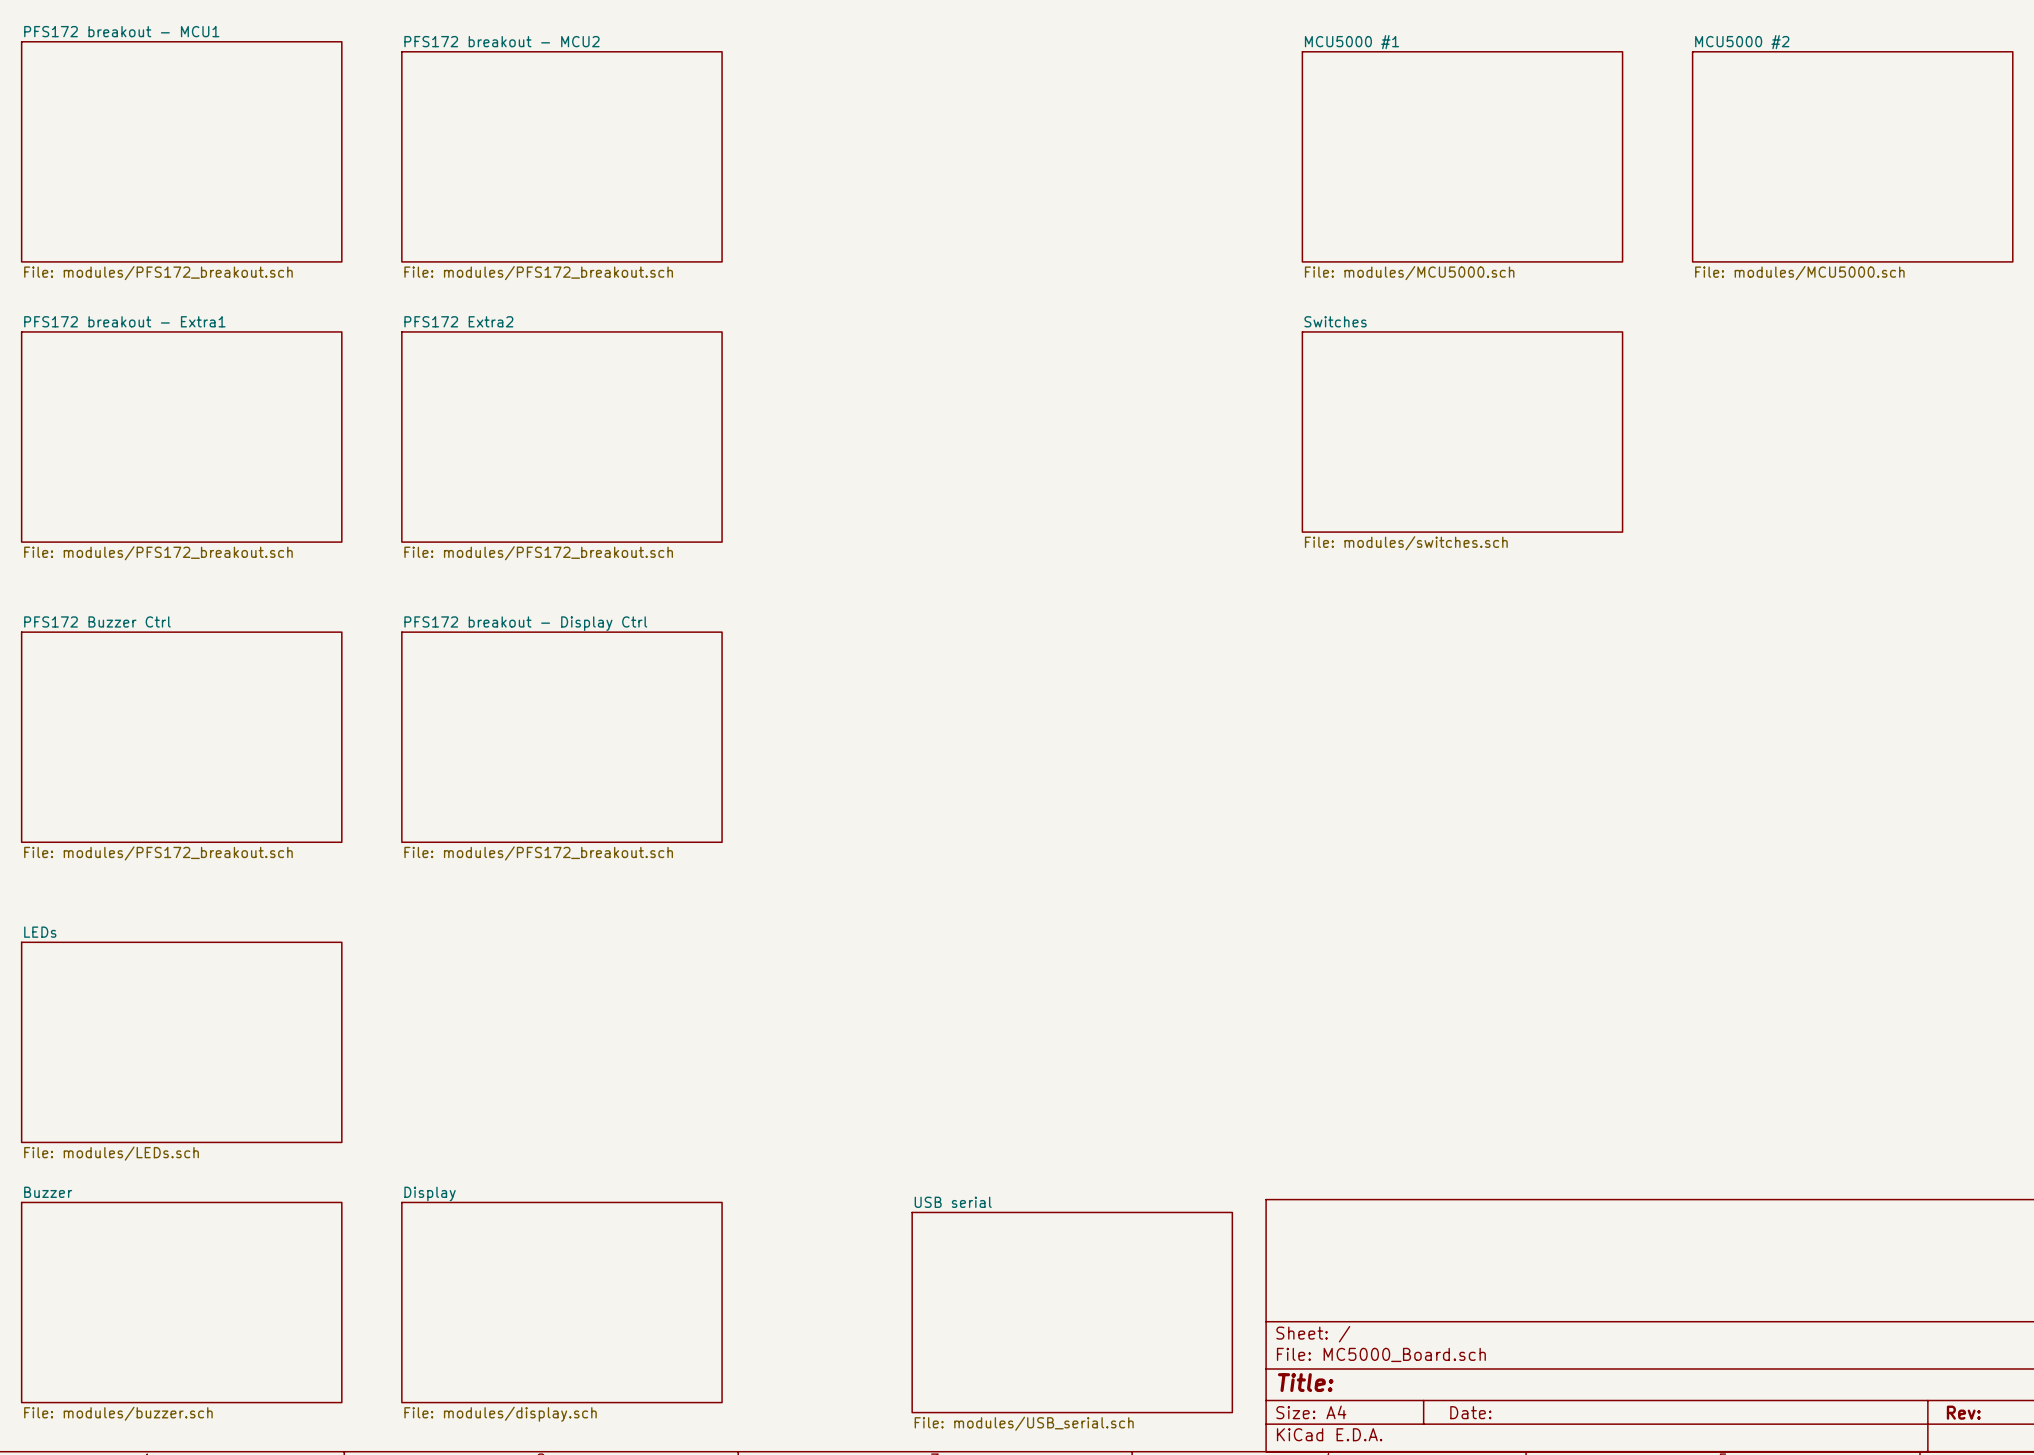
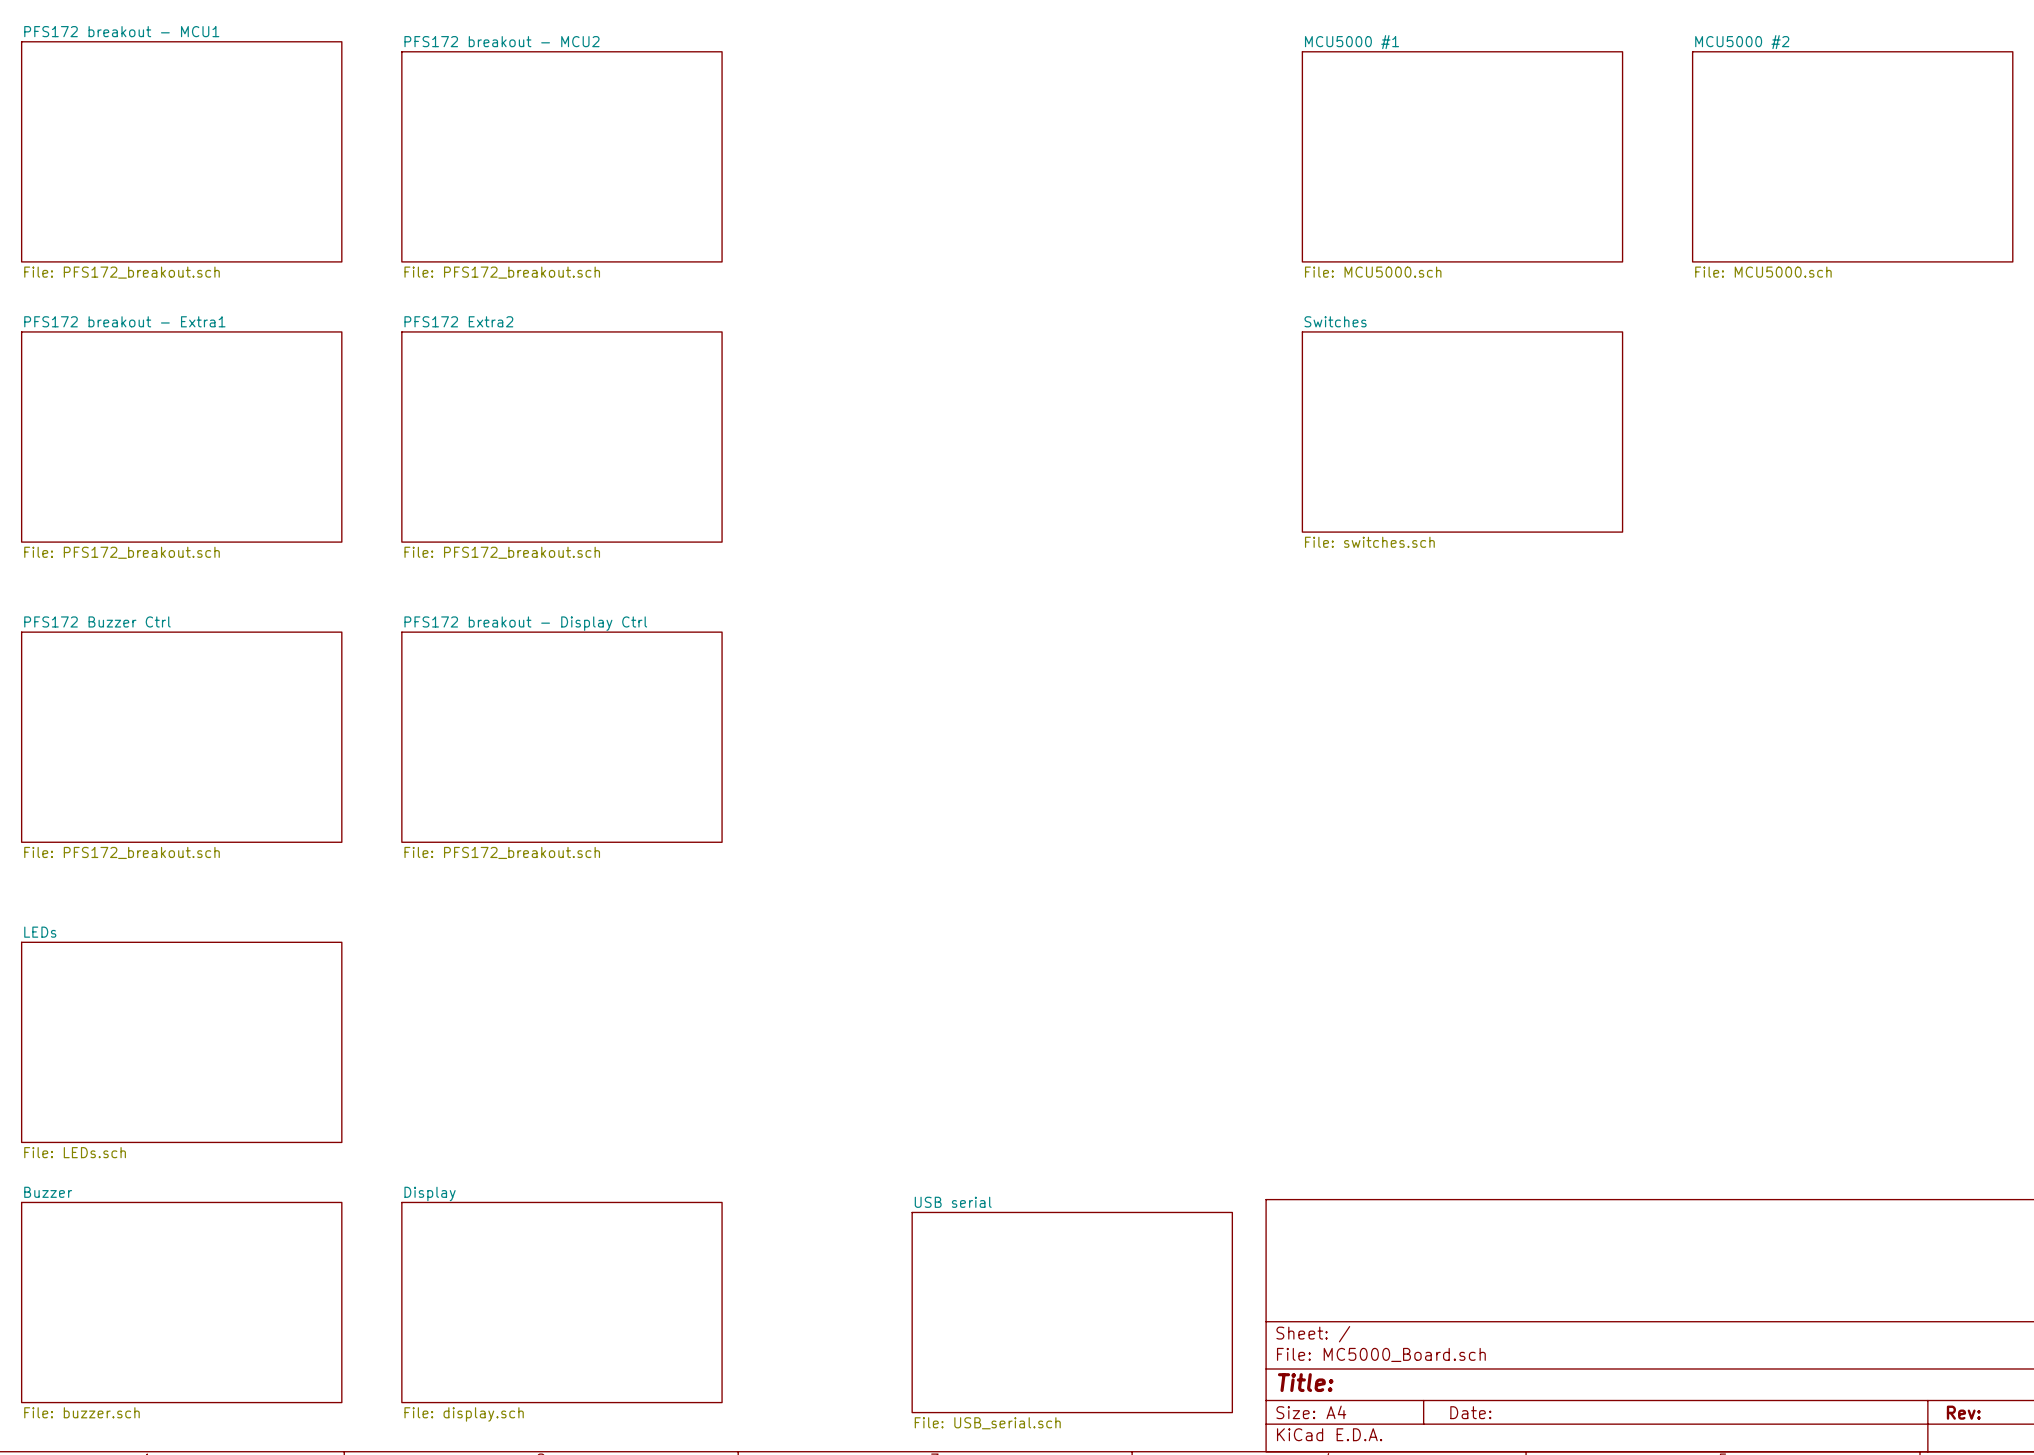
sheet PFS172 breakout - MCU1 value: File: modules/PFS172_breakout.sch (158, 273) -> File: PFS172_breakout.sch (122, 272)
sheet PFS172 breakout - MCU2 value: File: modules/PFS172_breakout.sch (538, 273) -> File: PFS172_breakout.sch (502, 272)
sheet MCU5000 #1 value: File: modules/MCU5000.sch (1409, 273) -> File: MCU5000.sch (1373, 272)
sheet MCU5000 #2 value: File: modules/MCU5000.sch (1799, 273) -> File: MCU5000.sch (1763, 272)
sheet Switches value: File: modules/switches.sch (1406, 543) -> File: switches.sch (1369, 542)
sheet PFS172 breakout - Extra1 value: File: modules/PFS172_breakout.sch (158, 553) -> File: PFS172_breakout.sch (122, 552)
sheet PFS172 Extra2 value: File: modules/PFS172_breakout.sch (538, 553) -> File: PFS172_breakout.sch (502, 552)
sheet PFS172 Buzzer Ctrl value: File: modules/PFS172_breakout.sch (158, 853) -> File: PFS172_breakout.sch (122, 852)
sheet PFS172 breakout - Display Ctrl value: File: modules/PFS172_breakout.sch (538, 853) -> File: PFS172_breakout.sch (502, 852)
sheet LEDs value: File: modules/LEDs.sch (111, 1153) -> File: LEDs.sch (75, 1152)
sheet Buzzer value: File: modules/buzzer.sch (118, 1413) -> File: buzzer.sch (81, 1412)
sheet Display value: File: modules/display.sch (500, 1414) -> File: display.sch (464, 1414)
sheet USB serial value: File: modules/USB_serial.sch (1024, 1423) -> File: USB_serial.sch (987, 1423)

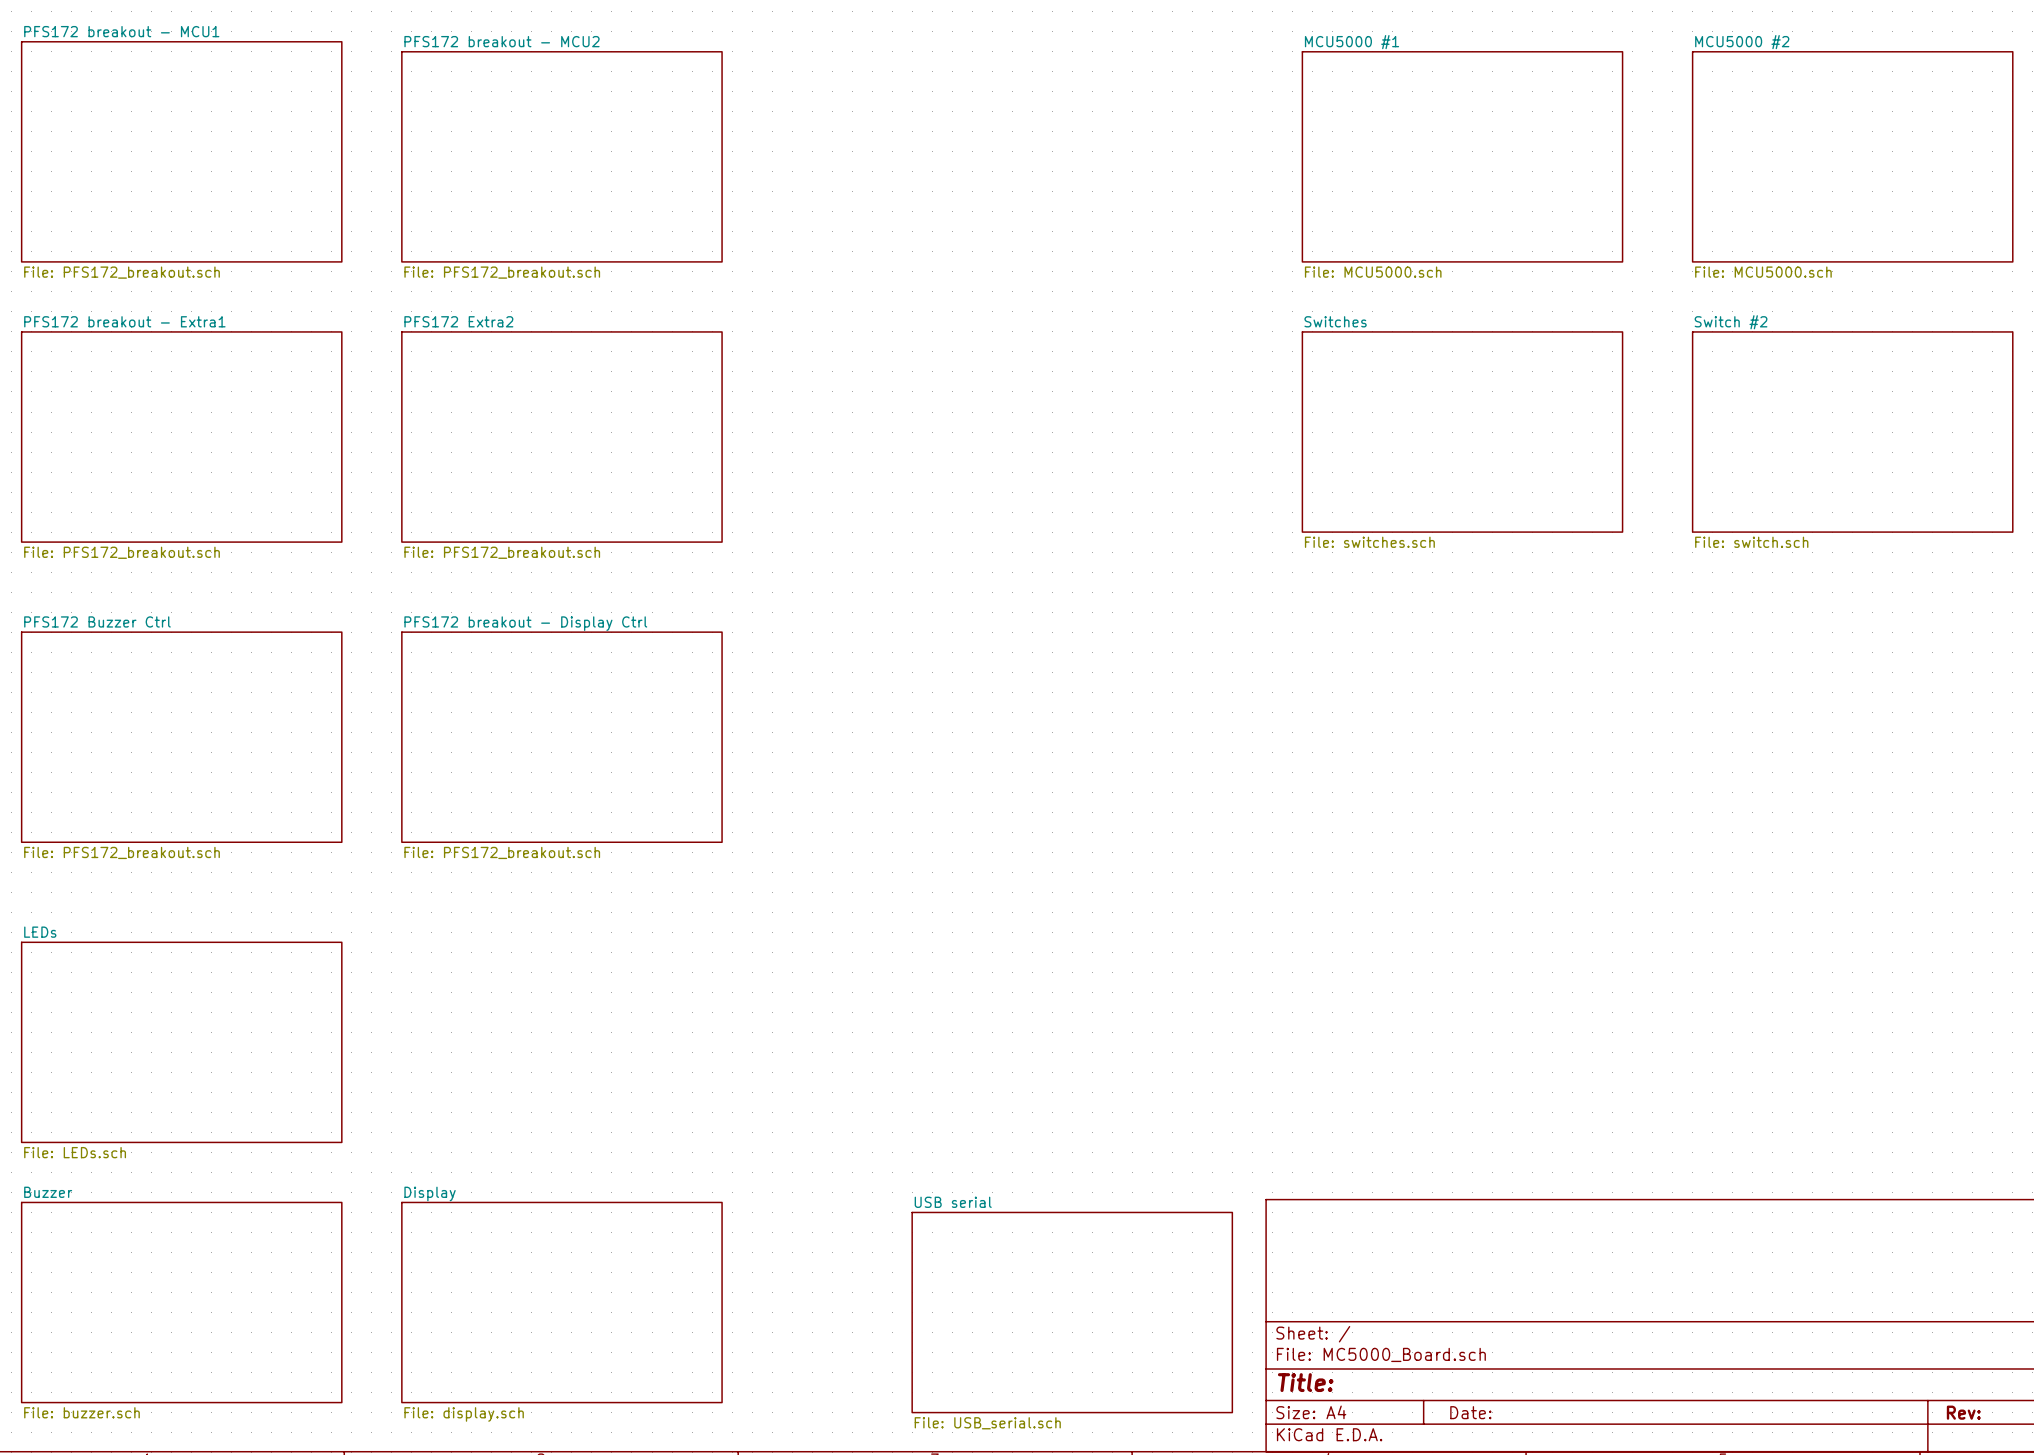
sheet Switch #2: none -> File: switch.sch (1852, 432)

